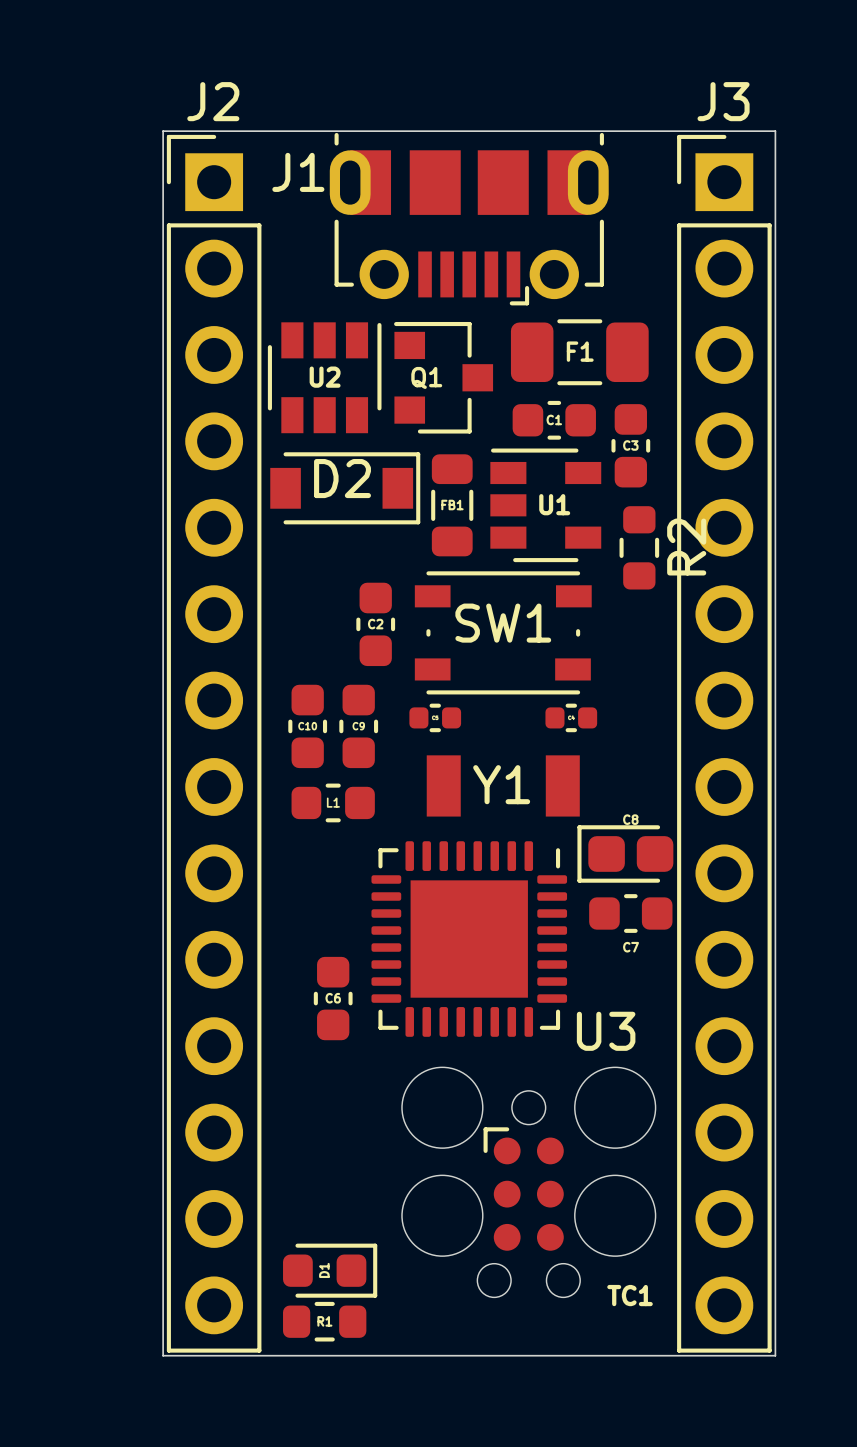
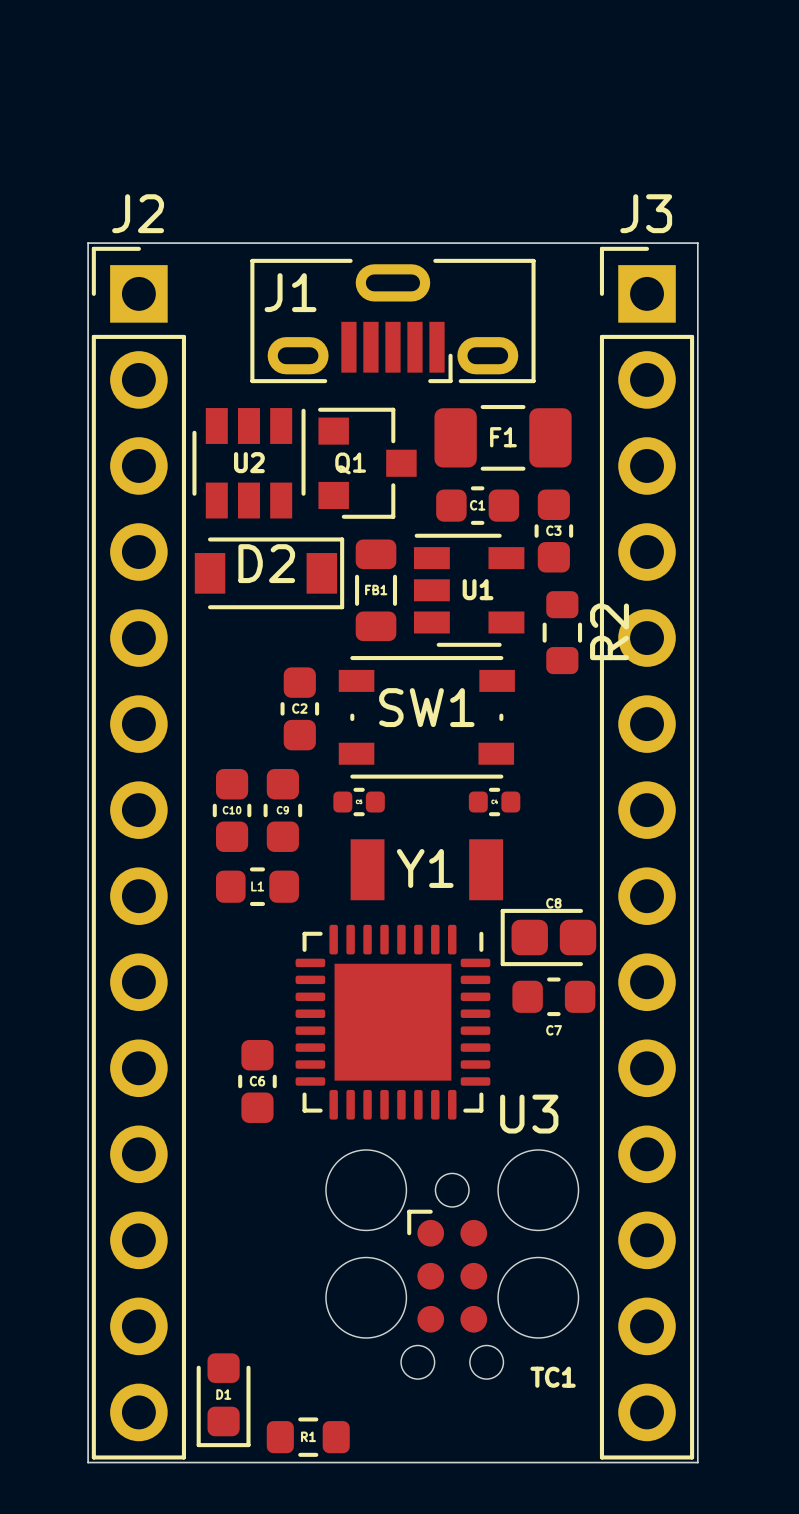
J1 footprint: [329, 132, 609, 306] -> [250, 258, 536, 384]
board edge: (163, 156) (163, 131) (775, 131) (775, 156) -> (88, 243) (697, 243)
J1 name position: J1 (298, 172) -> J1 (290, 292)
J2 position: (214, 743) -> (138, 853)
J3 position: (724, 743) -> (647, 853)
D1 rotation: 0° (330, 1270) -> 90° clockwise (223, 1400)
D1 position: (330, 1270) -> (223, 1400)
R1 position: (324, 1321) -> (308, 1437)
board edge: (163, 1355) (775, 1355) -> (88, 1437) (88, 1462) (697, 1462) (697, 1437)

